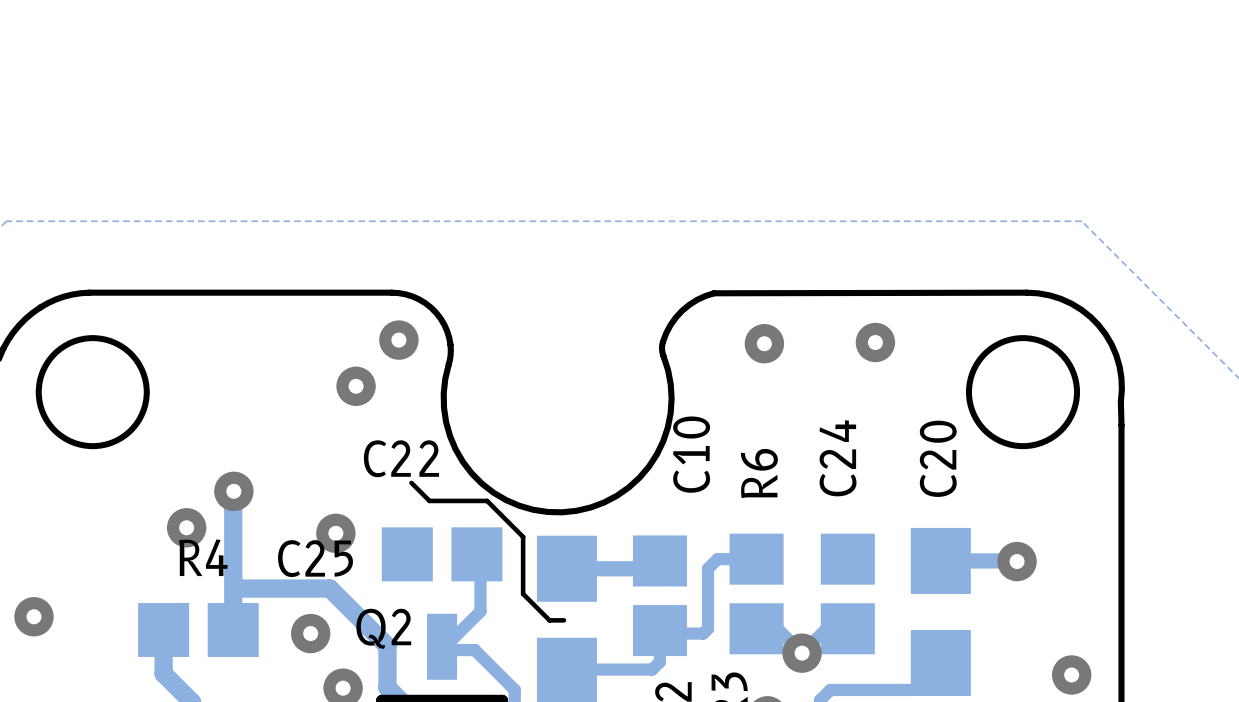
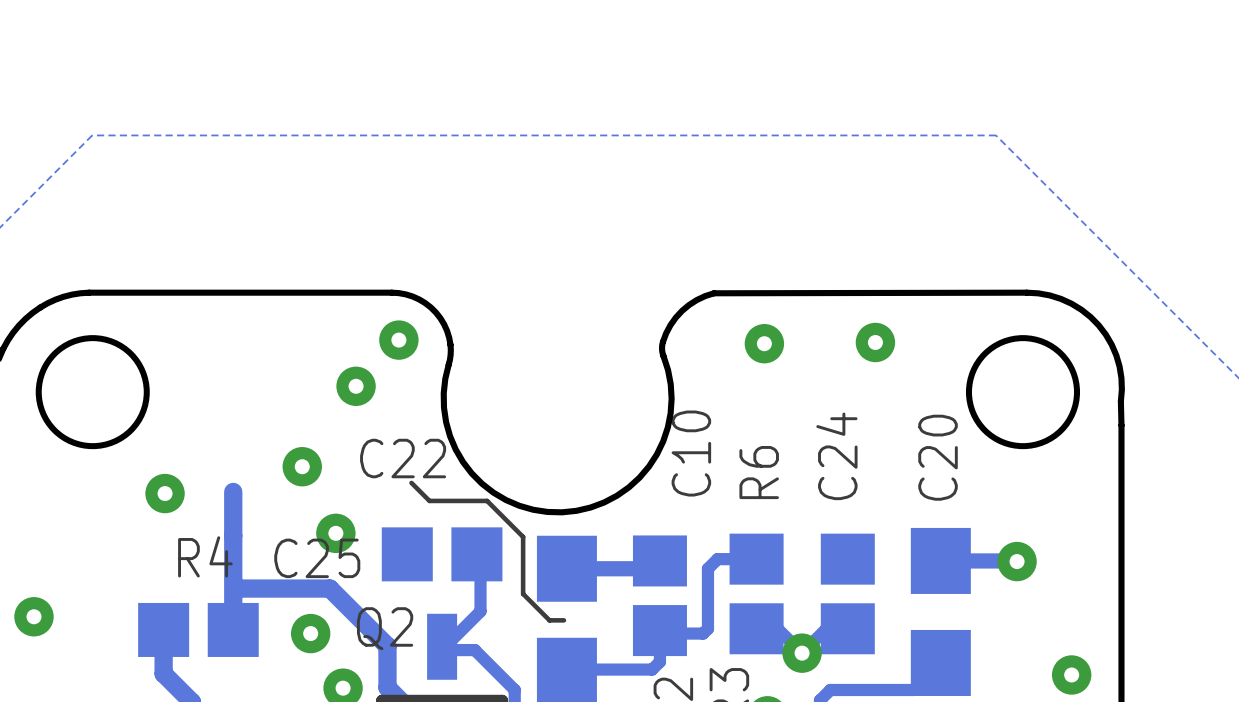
zone outline: (1081, 221) (6, 221) -> (1081, 221) (996, 135) (92, 135) (6, 221)
via: none -> (302, 466)
via: (233, 491) -> none
via position: (186, 527) -> (165, 493)

